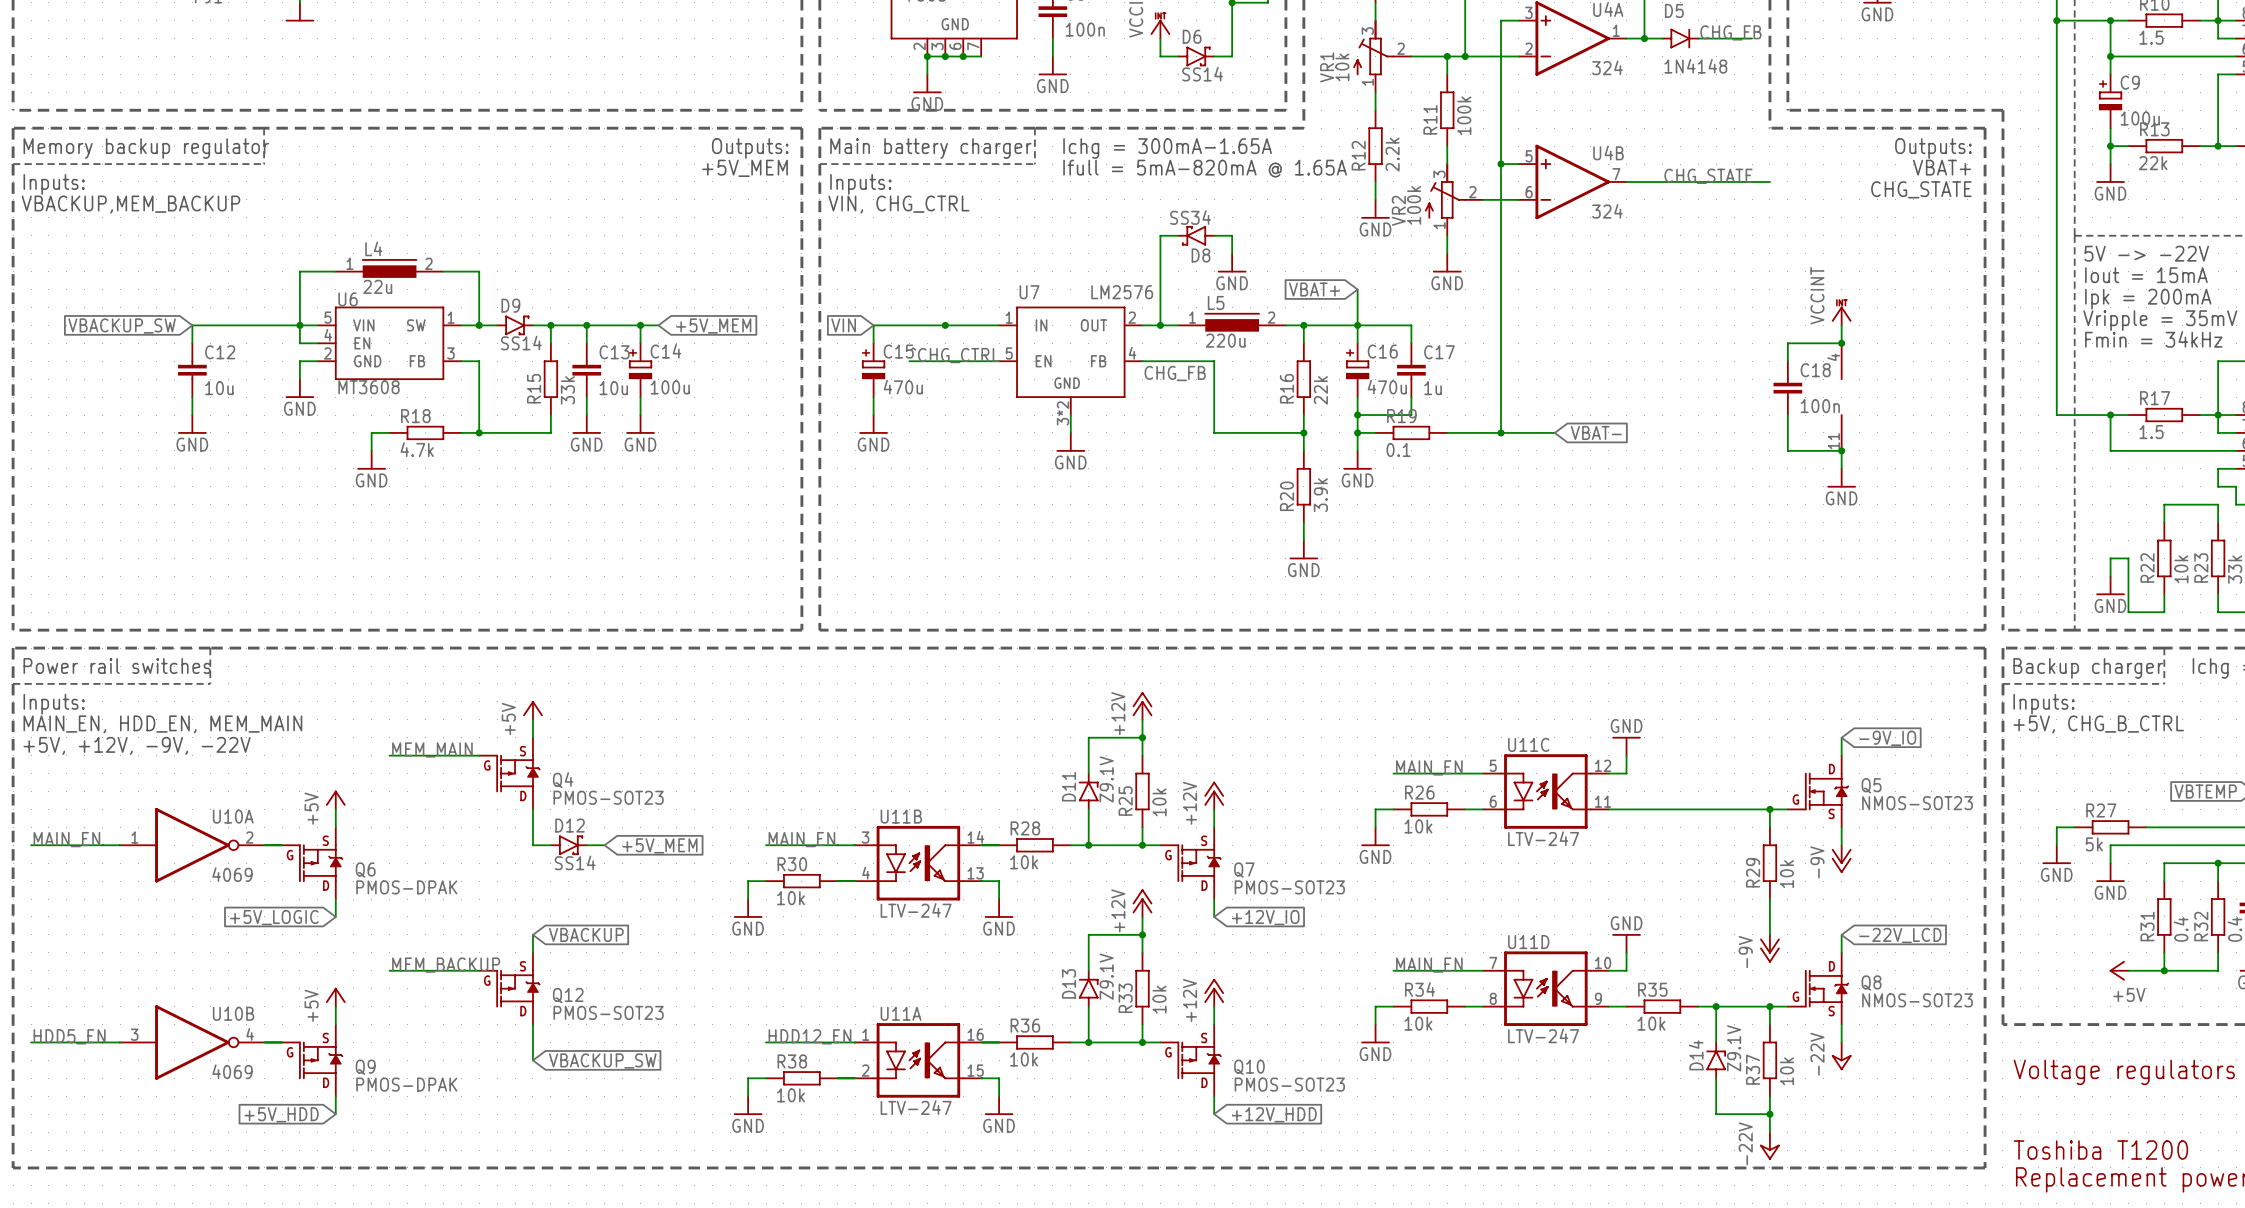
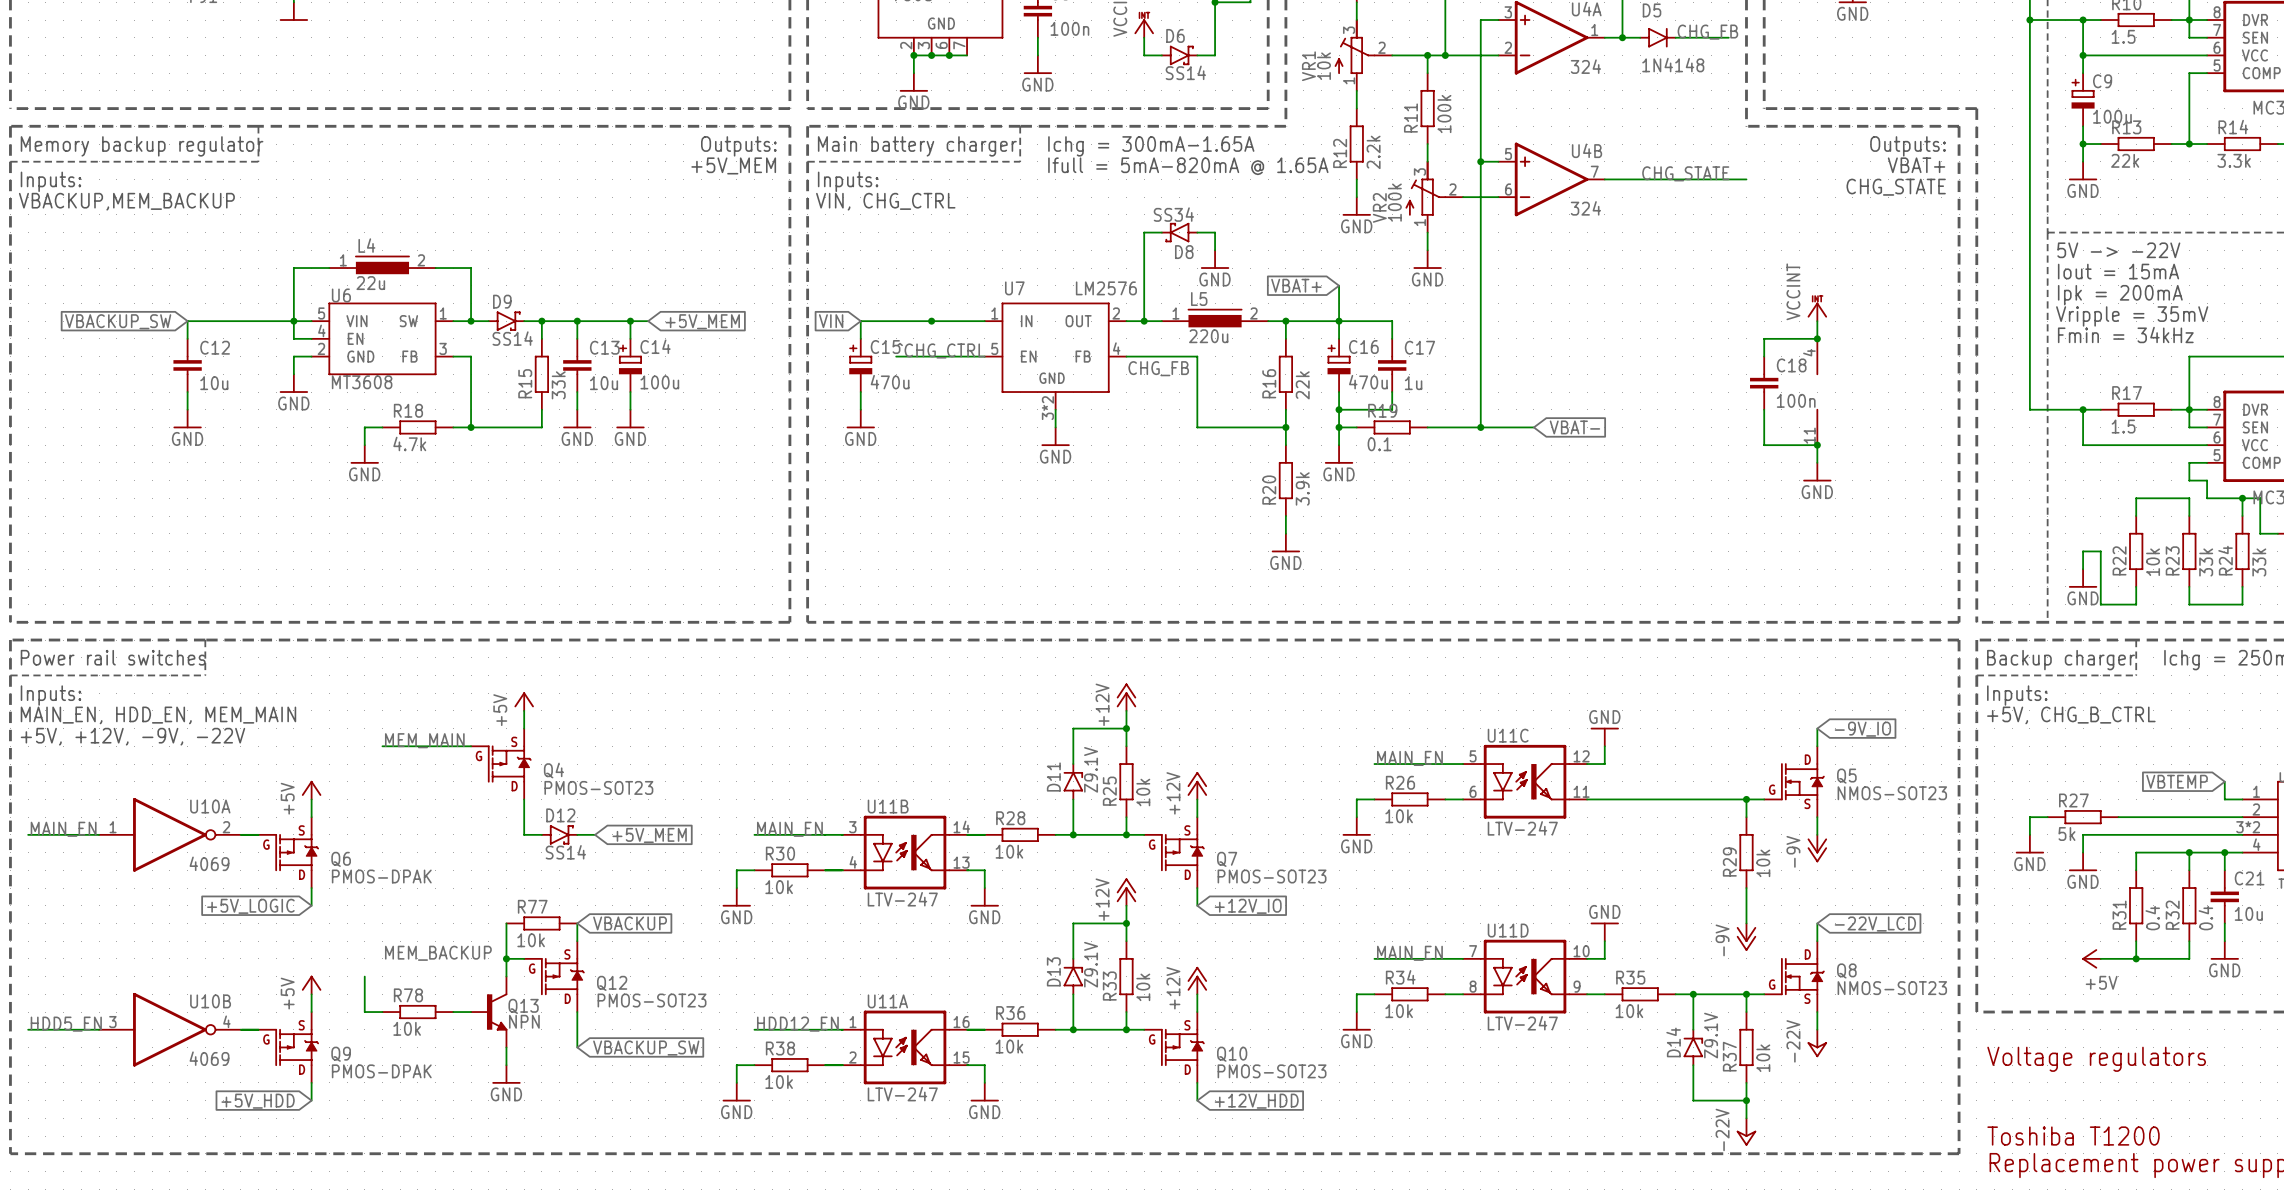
power symbol position: +5V (335, 800) -> +5V (311, 790)
wire: (335, 809) (335, 827) -> (311, 799) (311, 817)
U10A position: (192, 845) -> (169, 834)
Q6 position: (312, 863) -> (288, 852)
wire: (335, 899) (335, 916) -> (311, 888) (311, 905)
global label position: +5V_LOGIC (274, 917) -> +5V_LOGIC (250, 906)
wire: none -> (506, 923) (506, 976)
wire: (532, 934) (532, 952) -> (577, 923) (577, 941)
R77: none -> 10k (541, 923)
global label position: VBACKUP (586, 934) -> VBACKUP (630, 923)
wire: (389, 970) (479, 970) -> none
wire: none -> (506, 958) (524, 958)
junction: none -> (506, 958)
wire: none -> (364, 976) (364, 1012) (382, 1012)
Q12 position: (509, 988) -> (554, 976)
power symbol position: +5V (335, 997) -> +5V (311, 985)
wire: (335, 1006) (335, 1024) -> (311, 994) (311, 1012)
R78: none -> 10k (417, 1012)
wire: none -> (453, 1012) (471, 1012)
Q13: none -> NPN (489, 1012)
wire: (532, 1024) (532, 1060) -> (577, 1012) (577, 1047)
U10B position: (192, 1042) -> (169, 1029)
Q9 position: (312, 1060) -> (288, 1047)
wire: none -> (506, 1047) (506, 1065)
global label position: VBACKUP_SW (602, 1060) -> VBACKUP_SW (646, 1048)
power symbol: none -> GND (506, 1074)
wire: (335, 1096) (335, 1114) -> (311, 1082) (311, 1100)
global label position: +5V_HDD (281, 1114) -> +5V_HDD (258, 1101)

